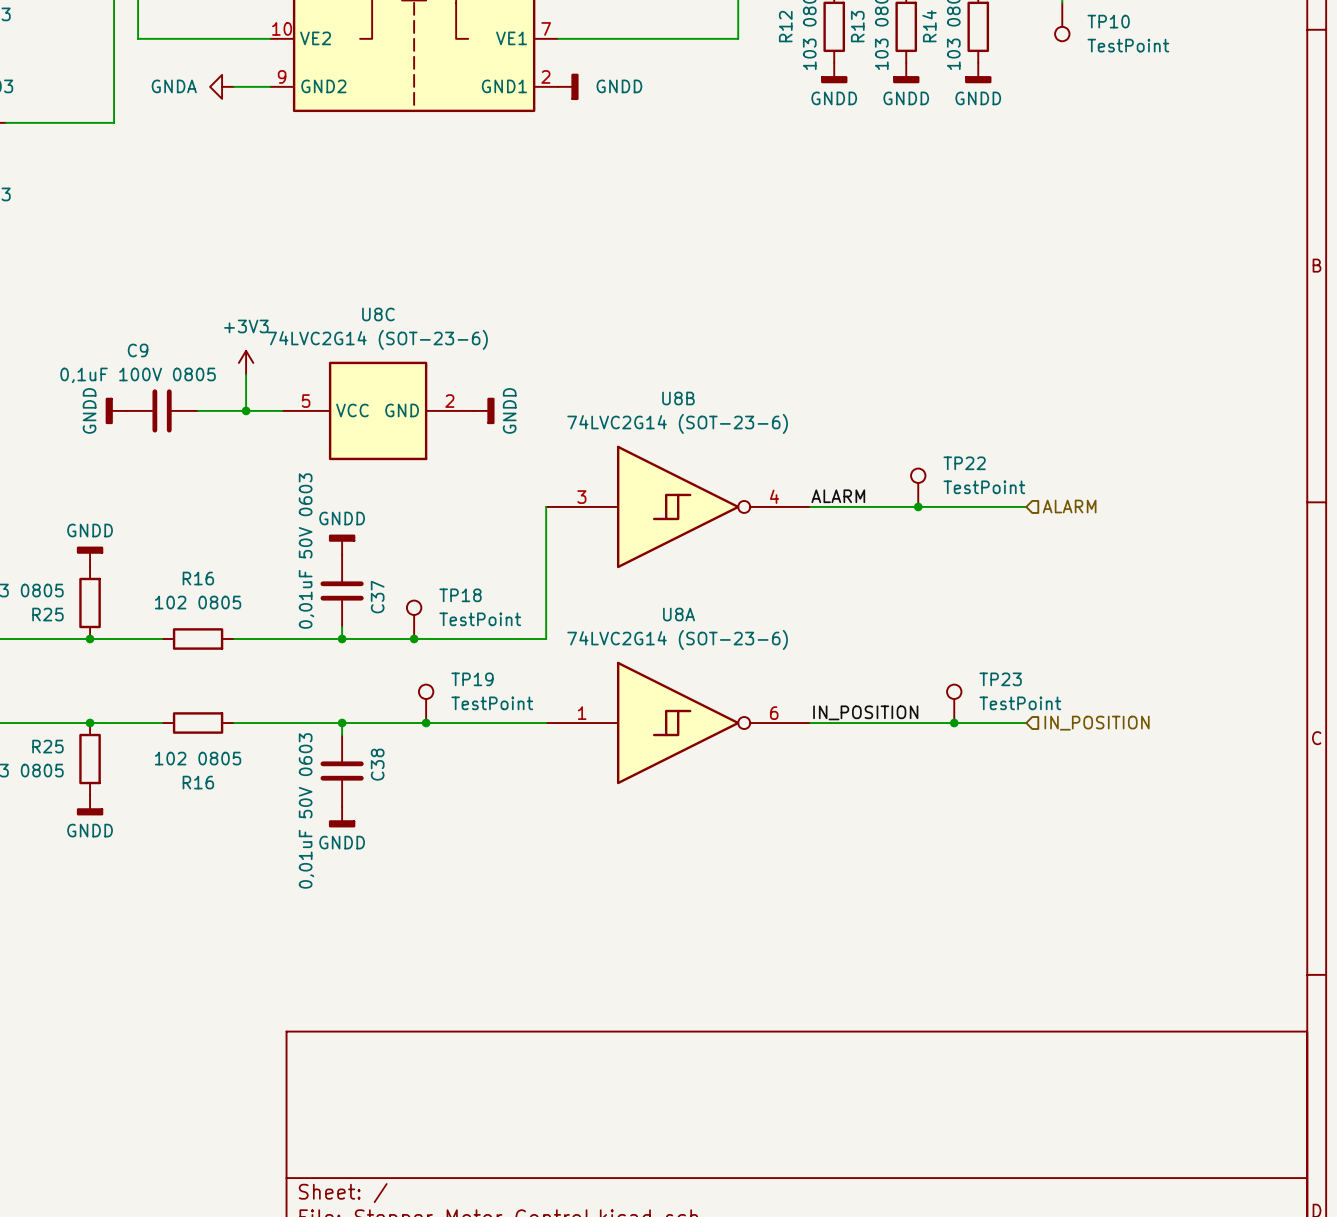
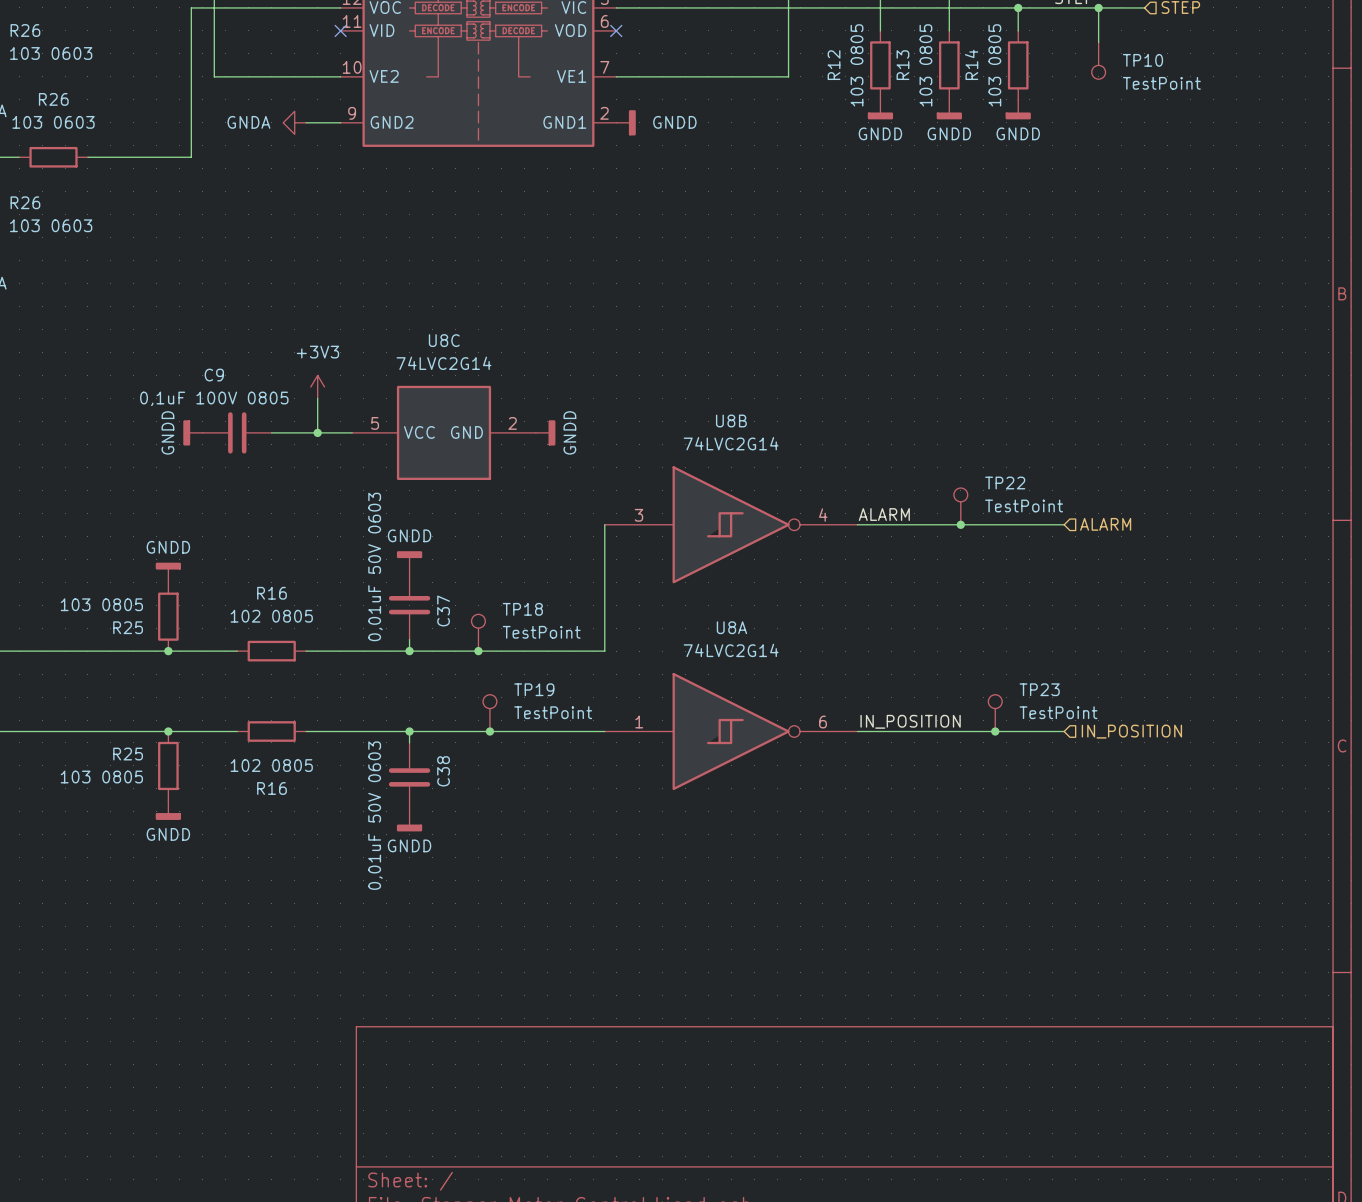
U8C value: 74LVC2G14 (SOT-23-6) (377, 339) -> 74LVC2G14 (444, 363)
U8B value: 74LVC2G14 (SOT-23-6) (677, 423) -> 74LVC2G14 (731, 443)
U8A value: 74LVC2G14 (SOT-23-6) (677, 639) -> 74LVC2G14 (731, 650)

